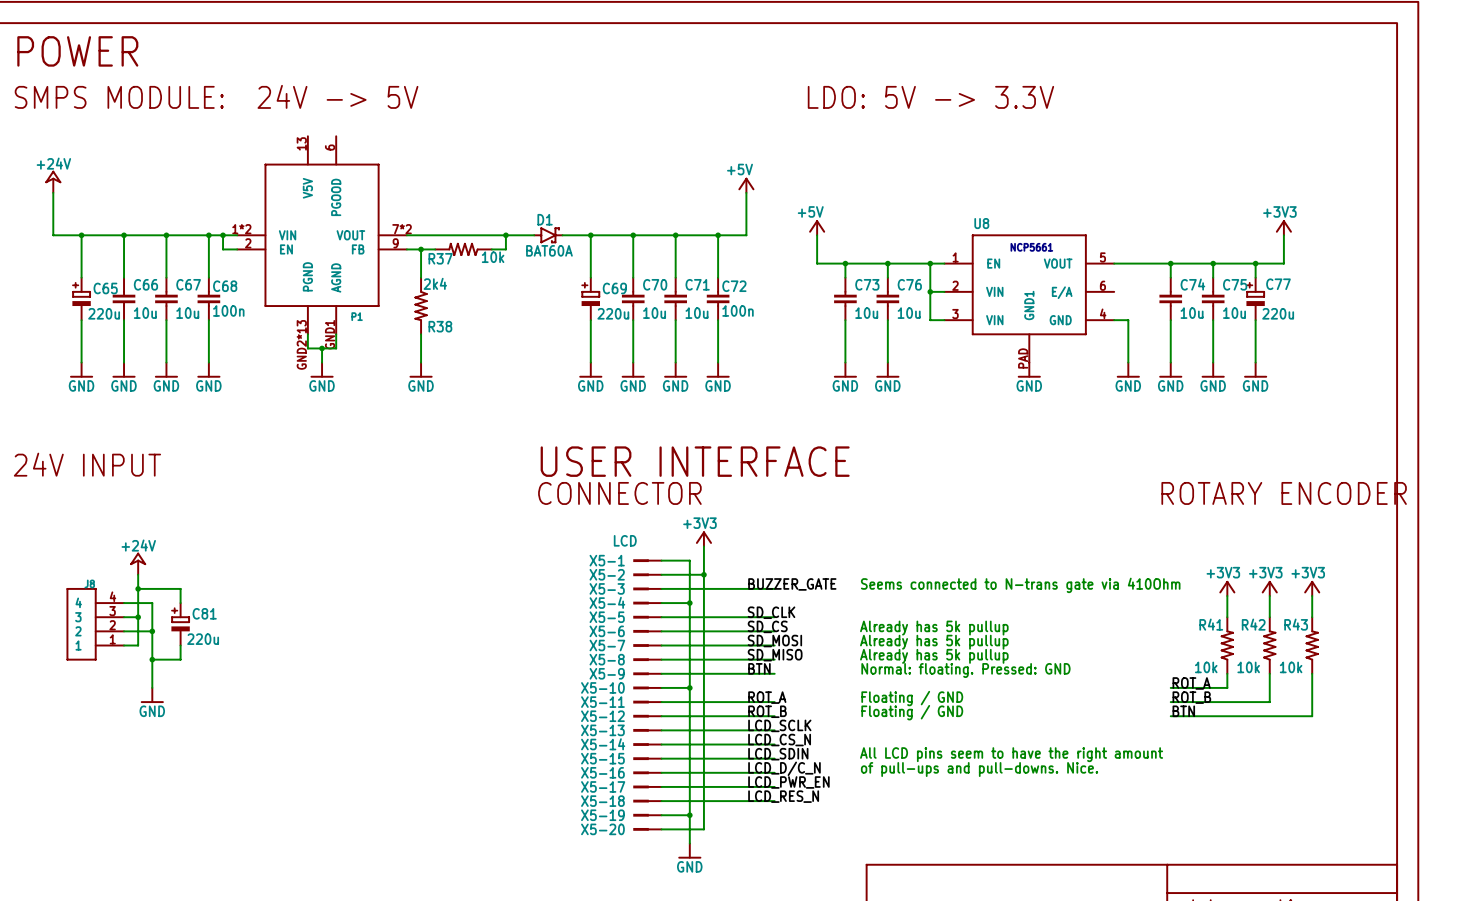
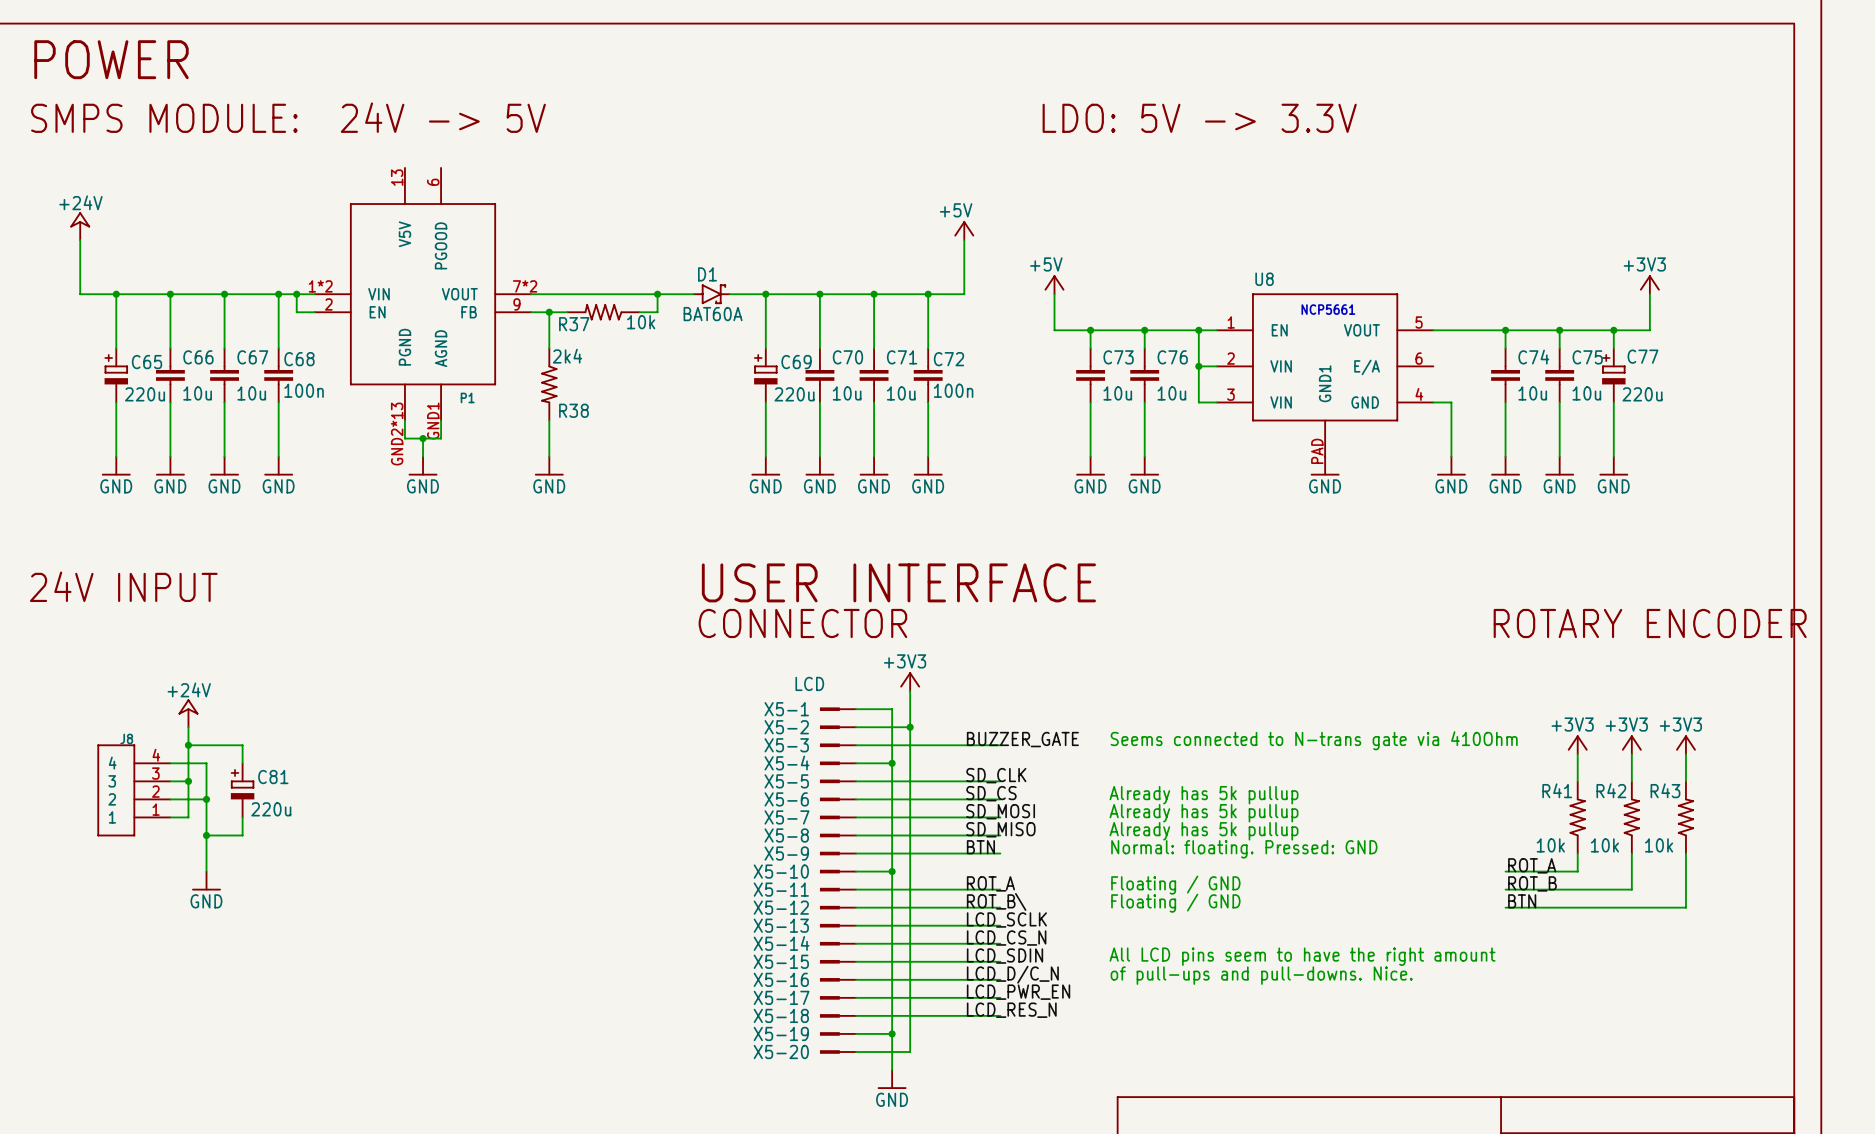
label: ROT_B (767, 711) -> ROT_B\ (996, 901)

